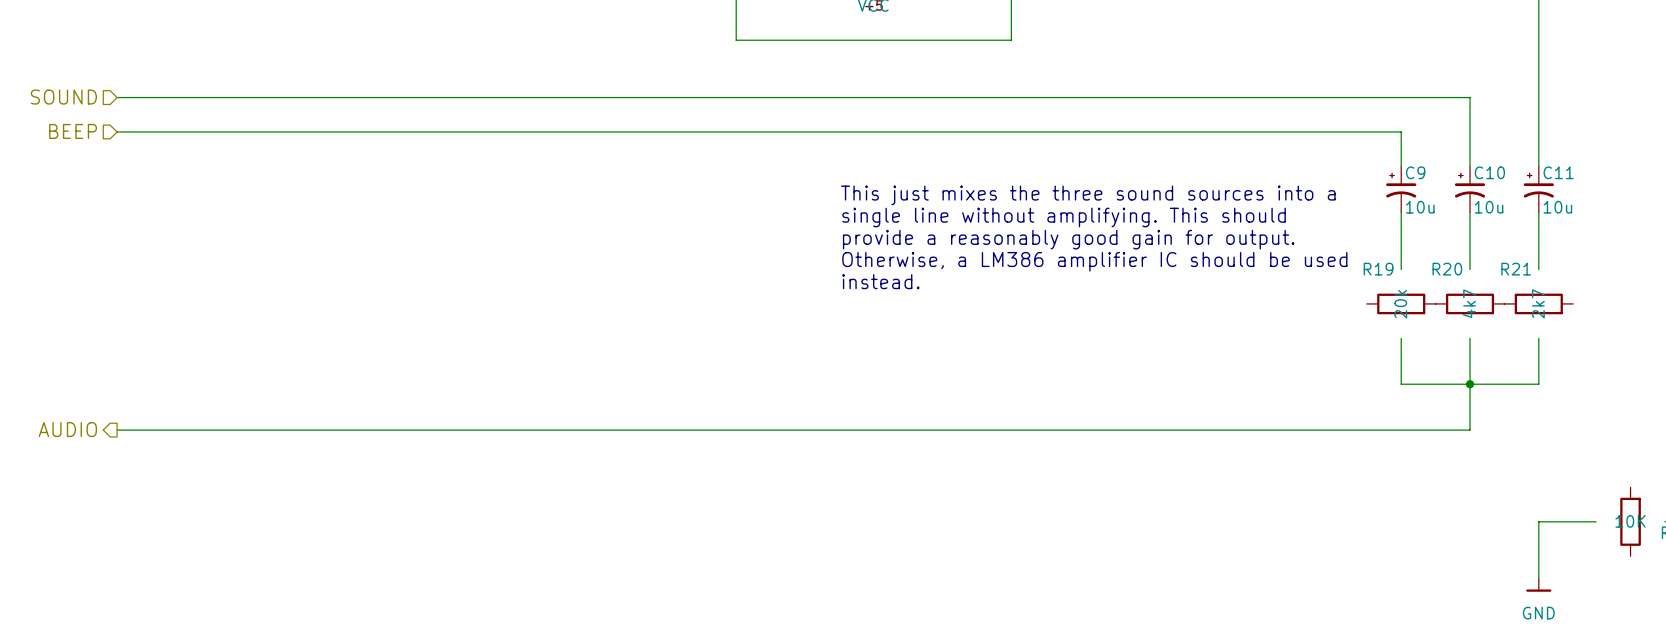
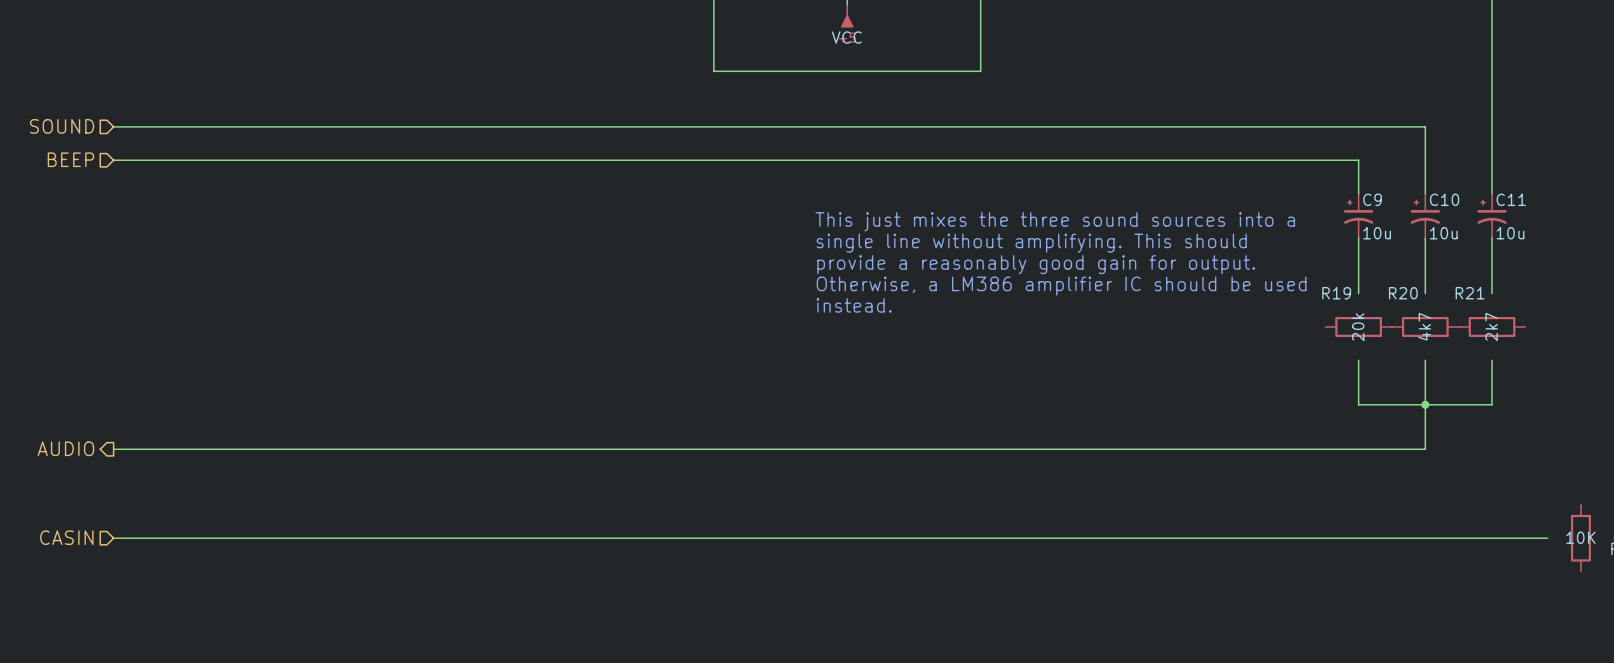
hierarchical label: none -> CASIN (66, 537)
wire: (1538, 521) (1538, 579) -> (1492, 538) (113, 538)
power symbol: GND (1538, 585) -> none

